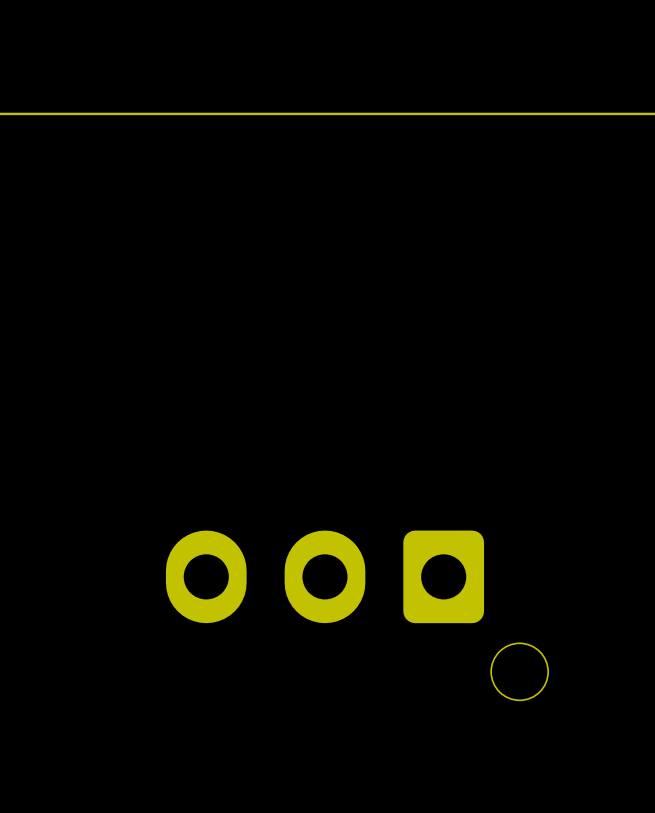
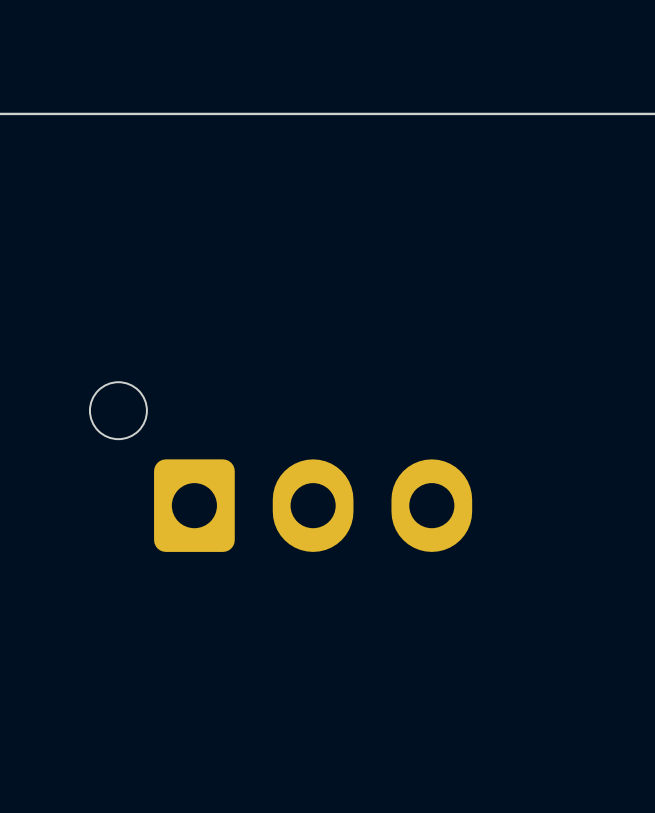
part rotation: 0° (357, 615) -> 180° (281, 467)

